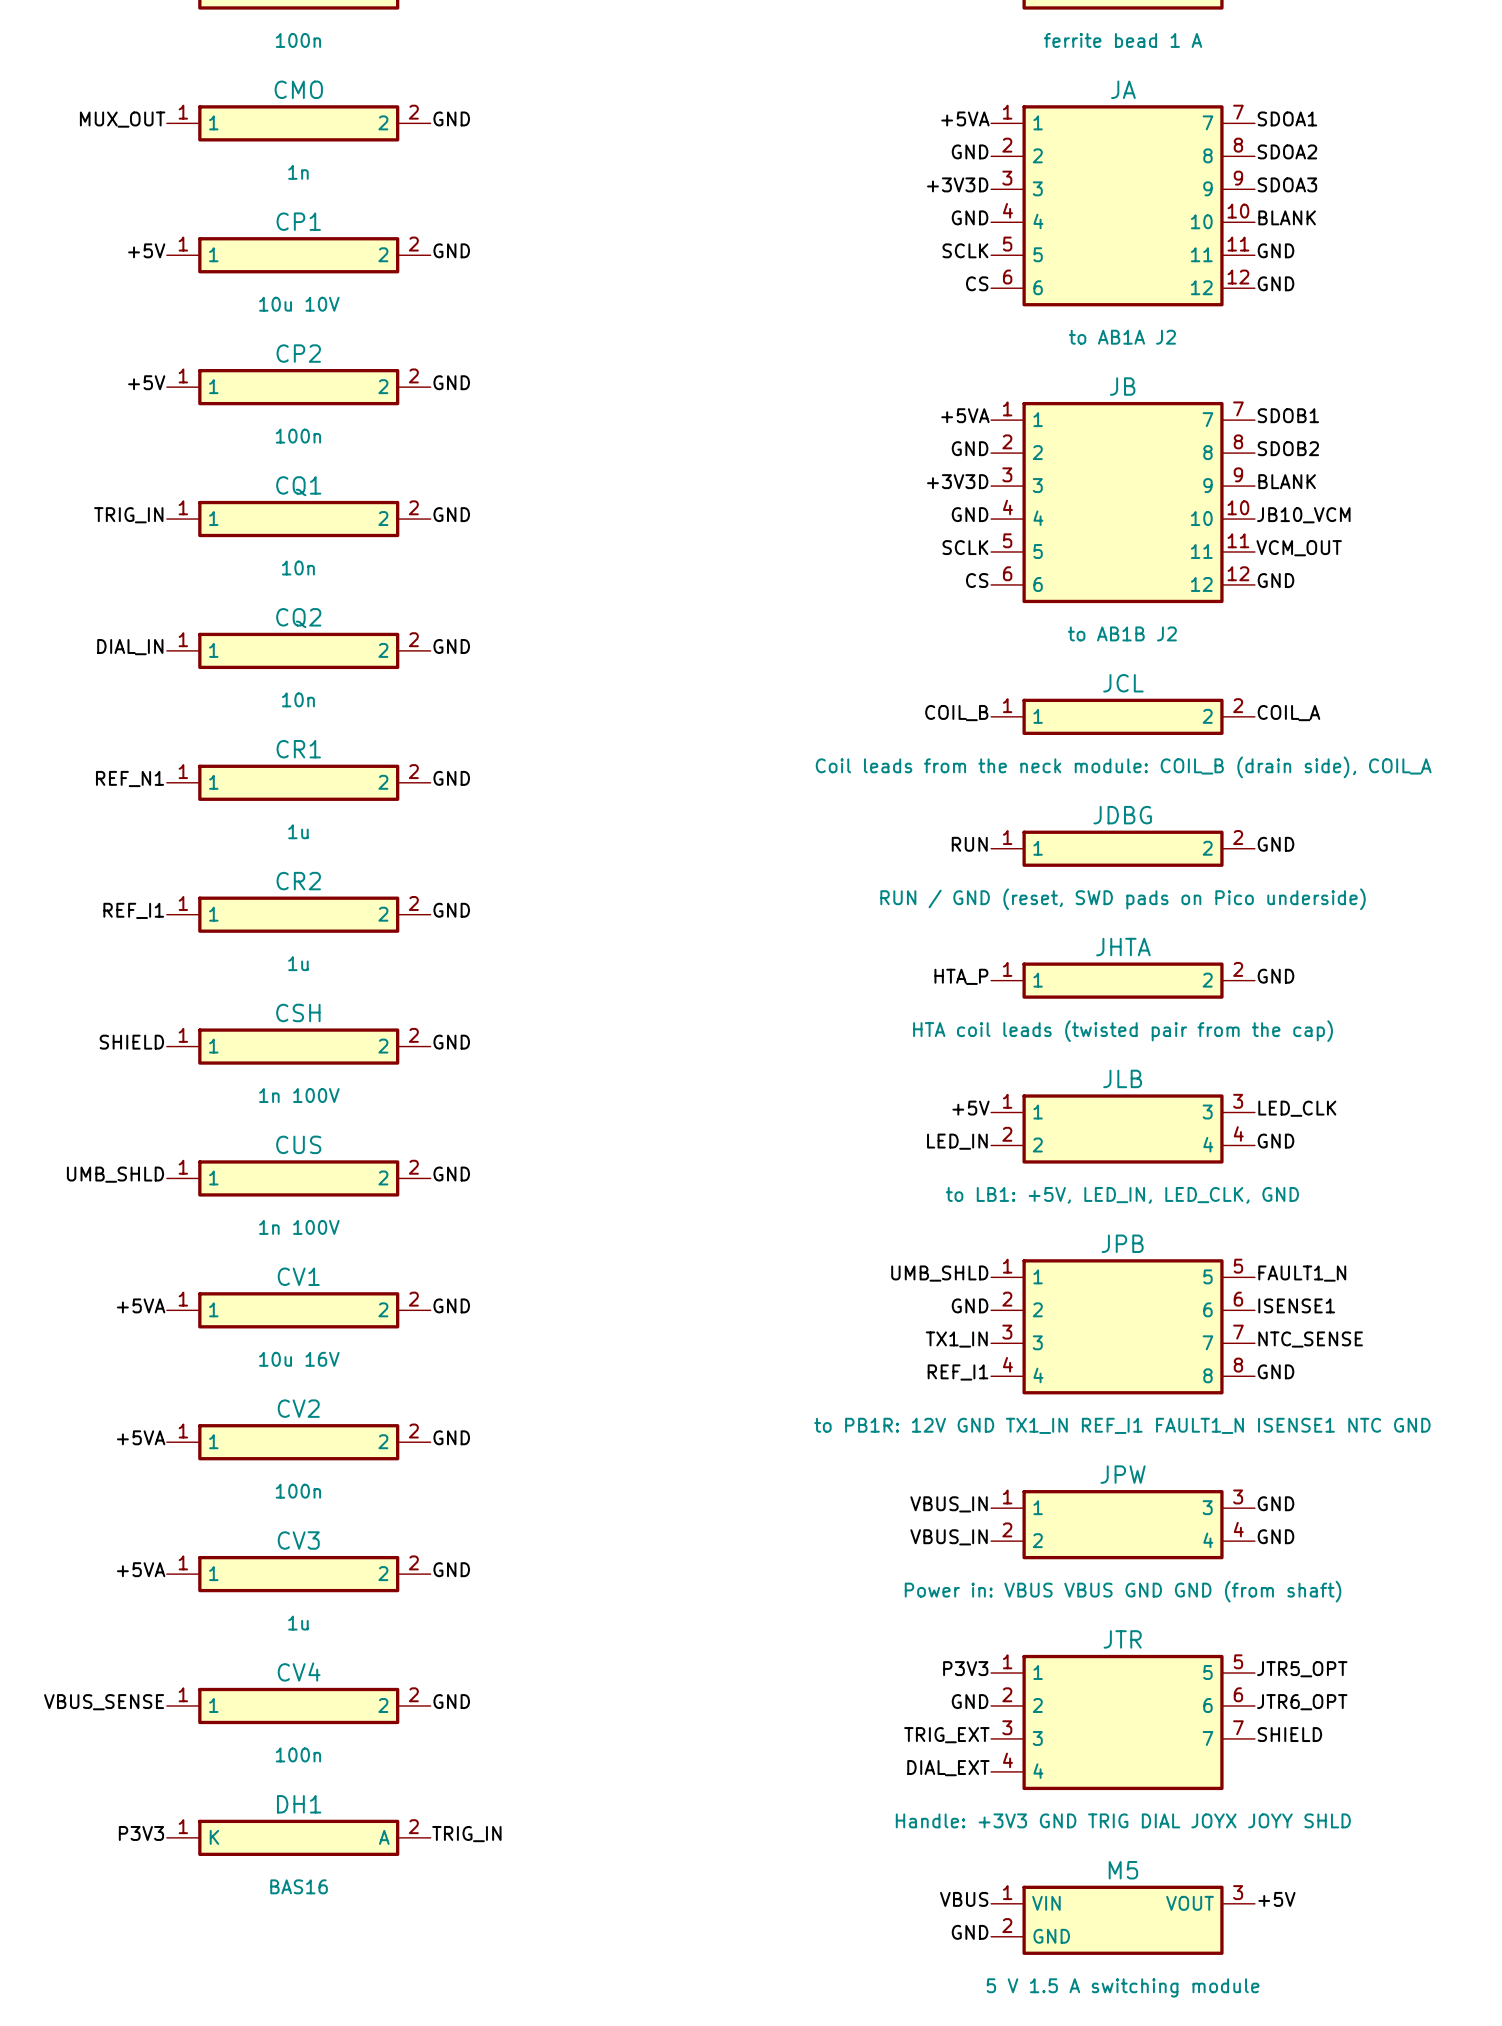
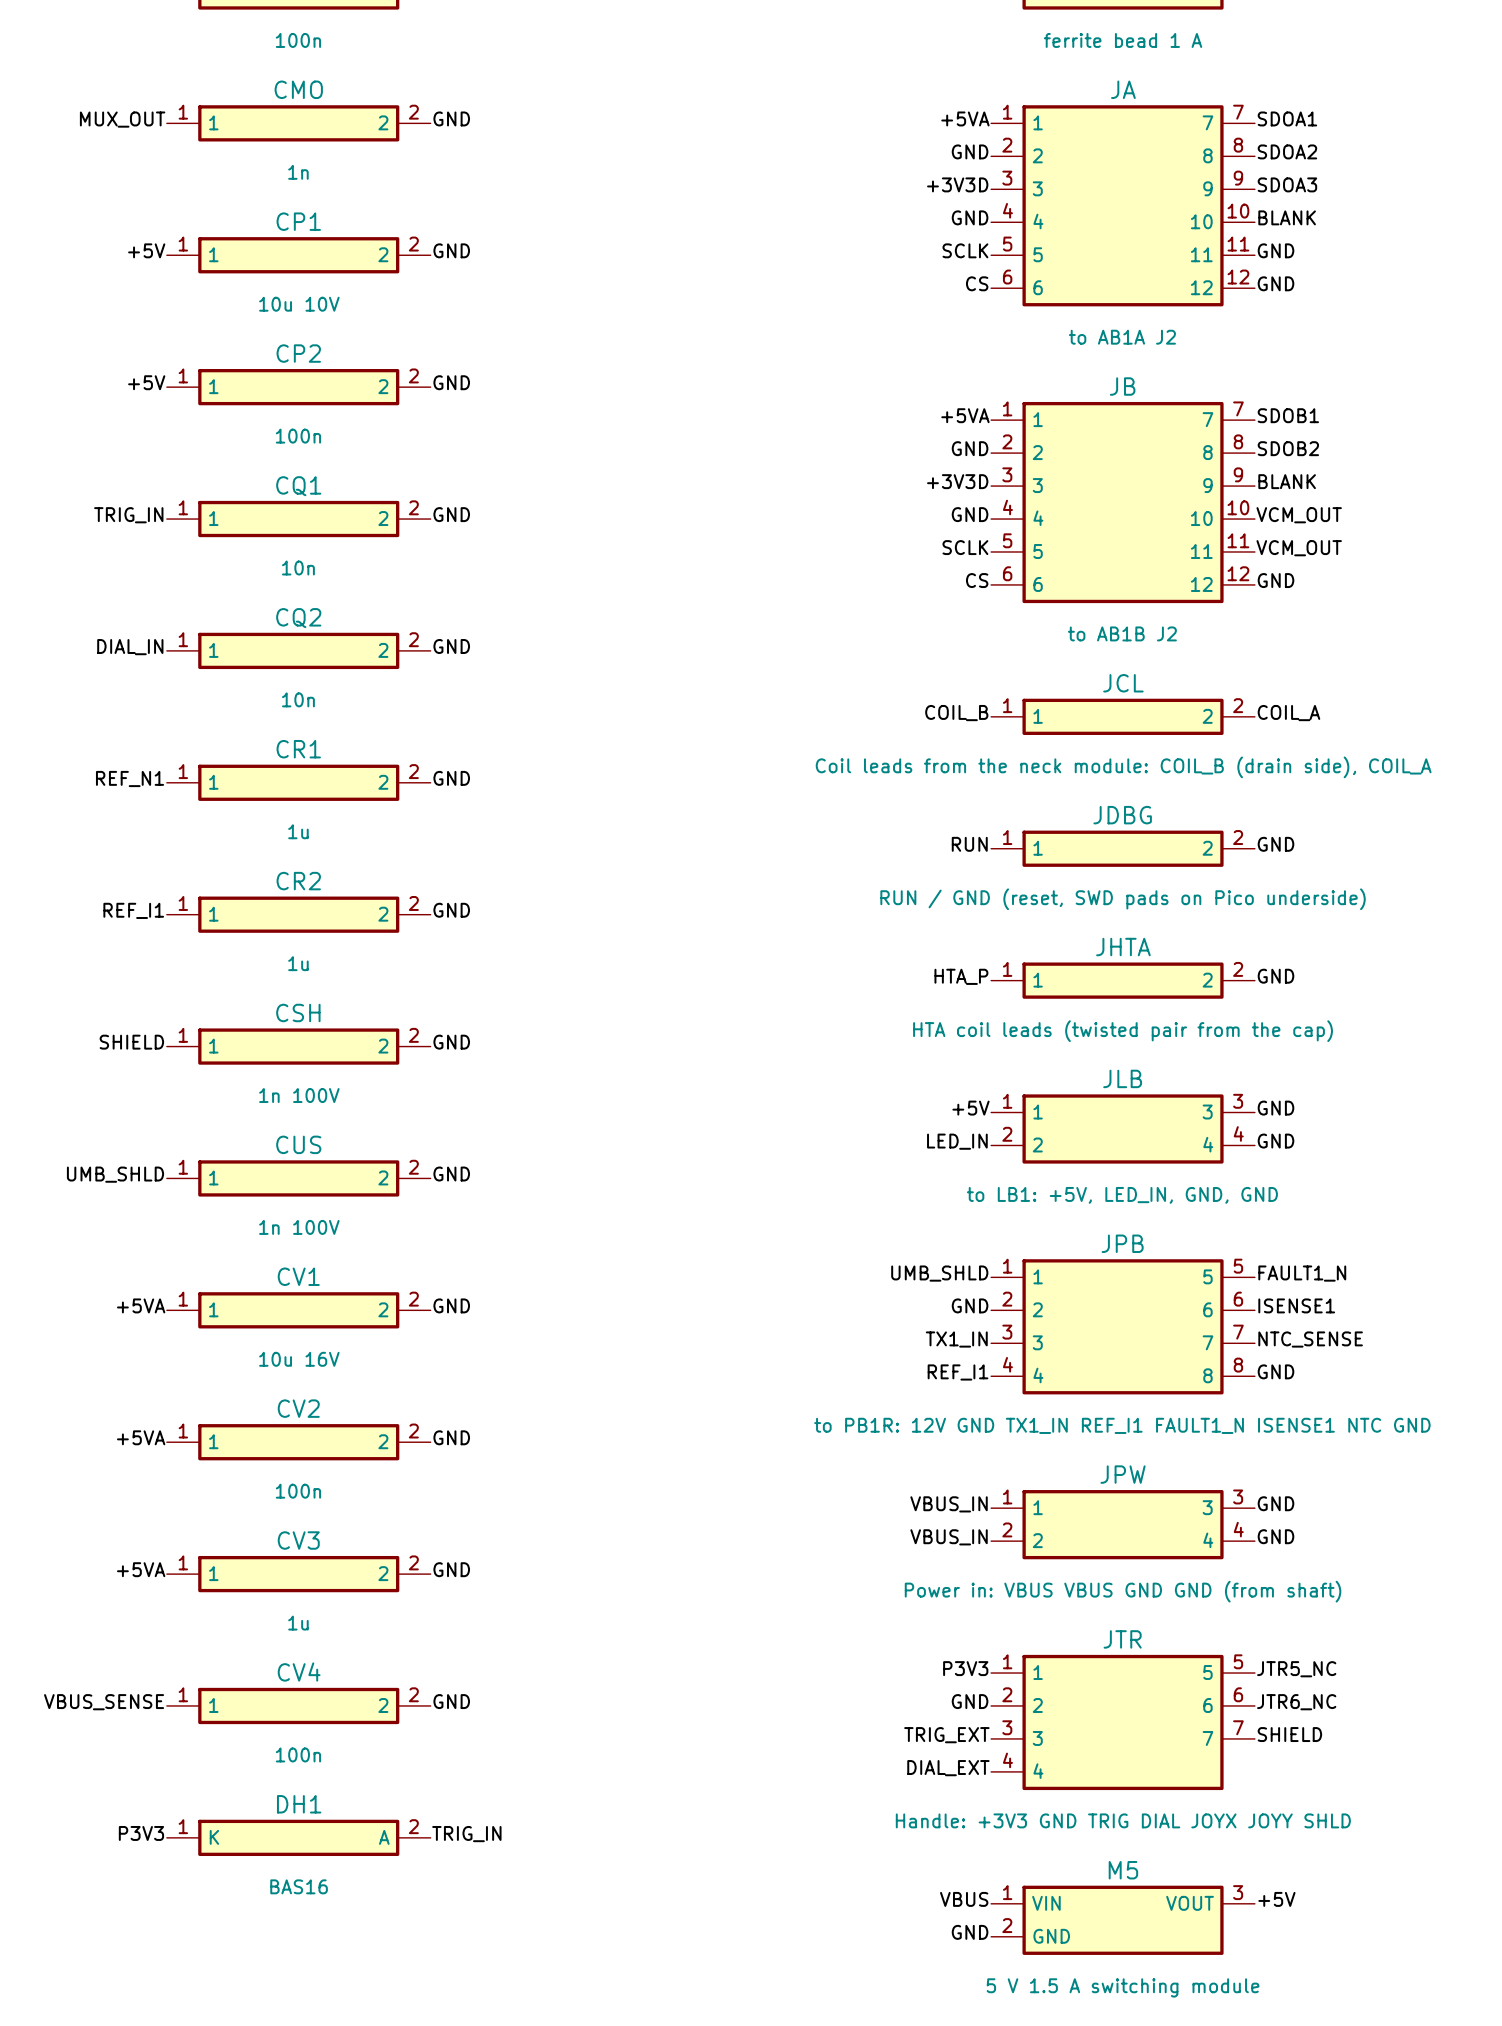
label: JB10_VCM (1303, 515) -> VCM_OUT (1299, 515)
label: LED_CLK (1297, 1108) -> GND (1276, 1108)
JLB value: to LB1: +5V, LED_IN, LED_CLK, GND (1122, 1195) -> to LB1: +5V, LED_IN, GND, GND (1122, 1195)
label: JTR5_OPT (1302, 1669) -> JTR5_NC (1296, 1669)
label: JTR6_OPT (1302, 1702) -> JTR6_NC (1296, 1702)

